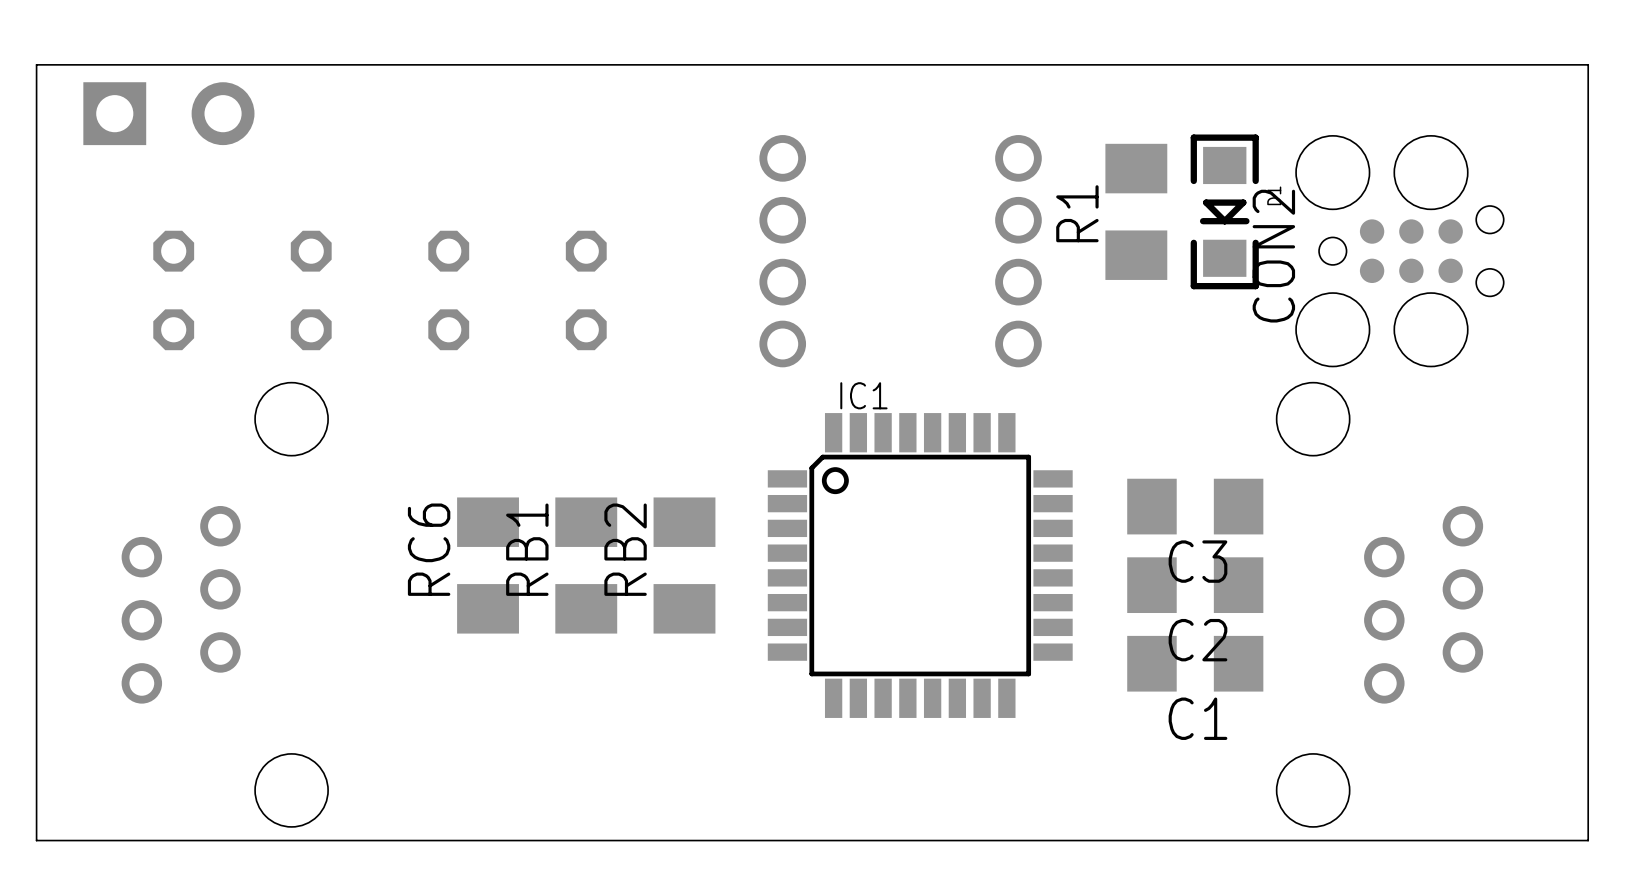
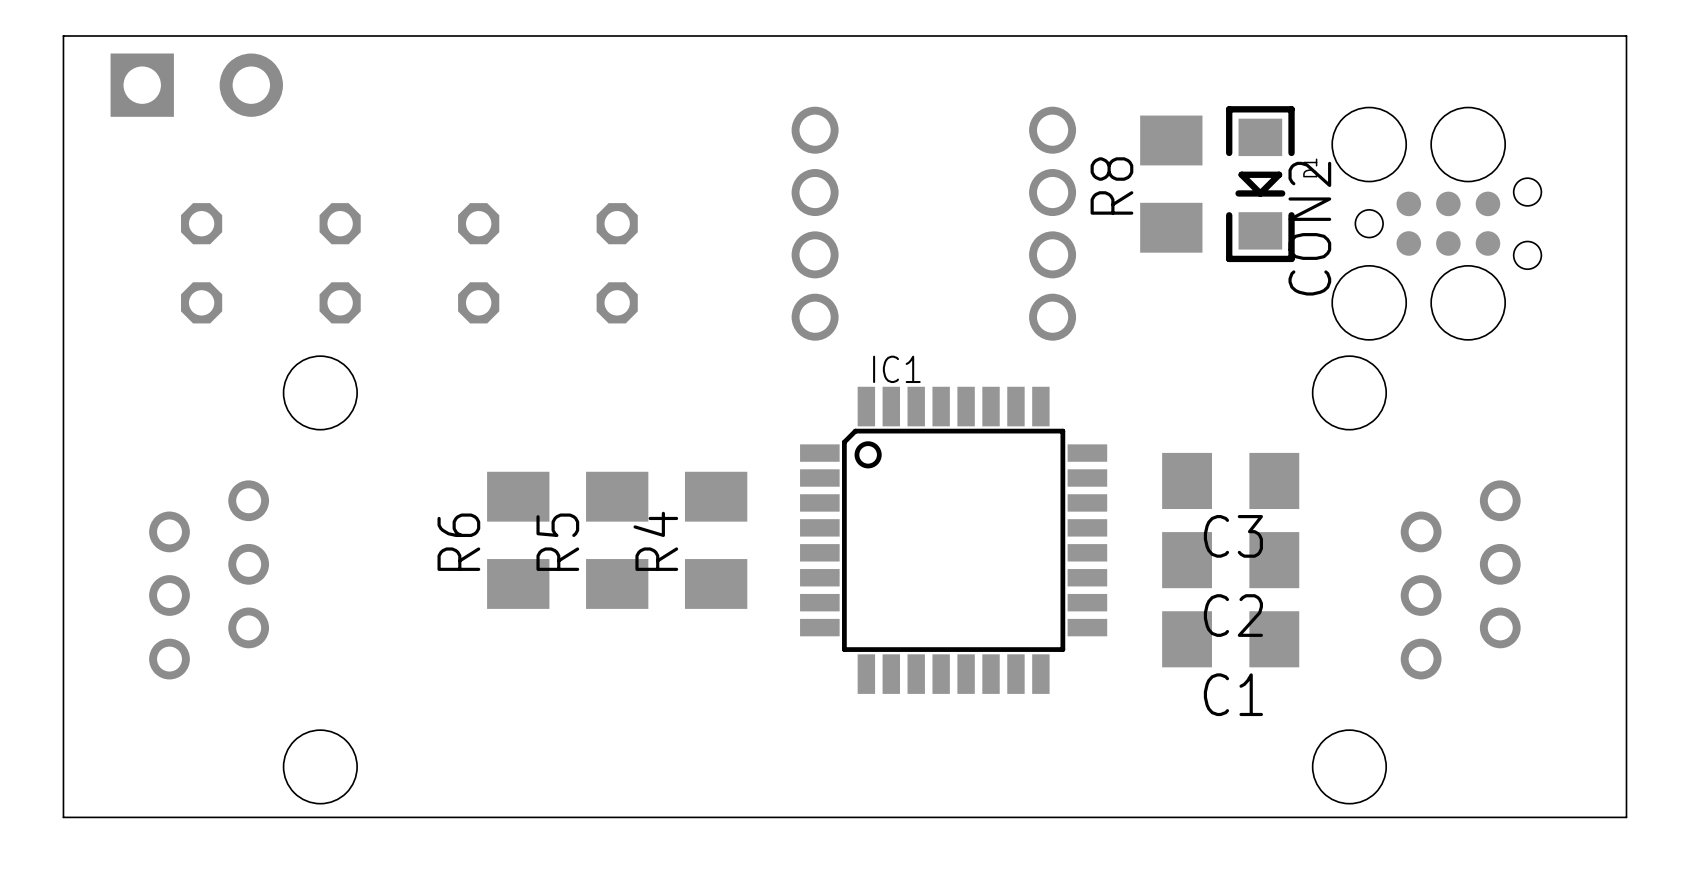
R1 name: R1 (1077, 213) -> R8 (1111, 185)
RC6 name: RC6 (429, 549) -> R6 (458, 542)
RB1 name: RB1 (527, 549) -> R5 (557, 542)
RB2 name: RB2 (625, 549) -> R4 (655, 541)

